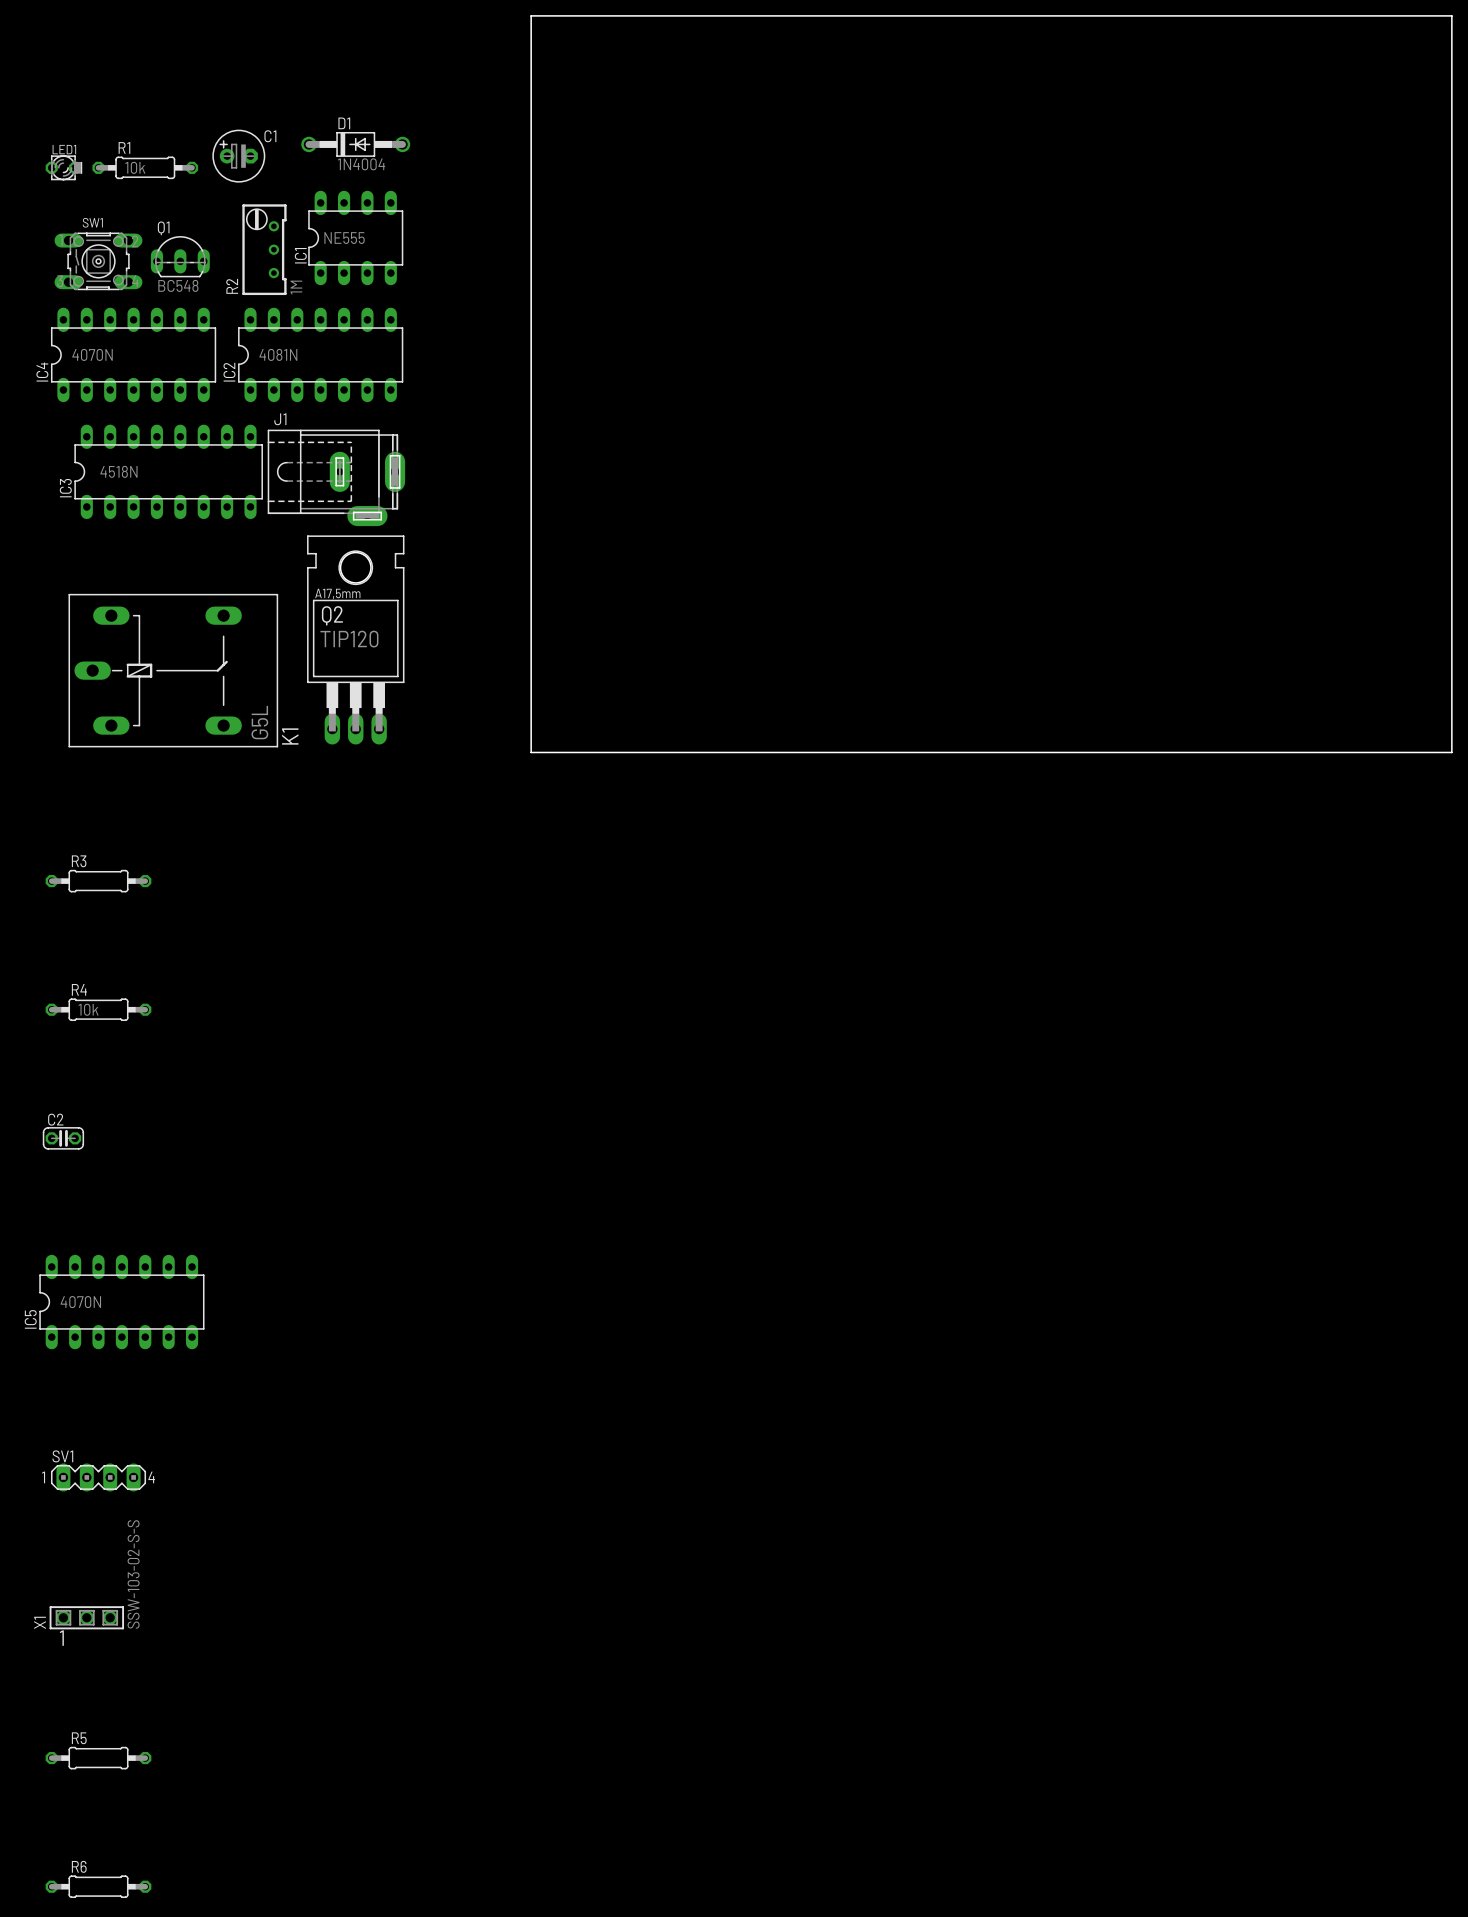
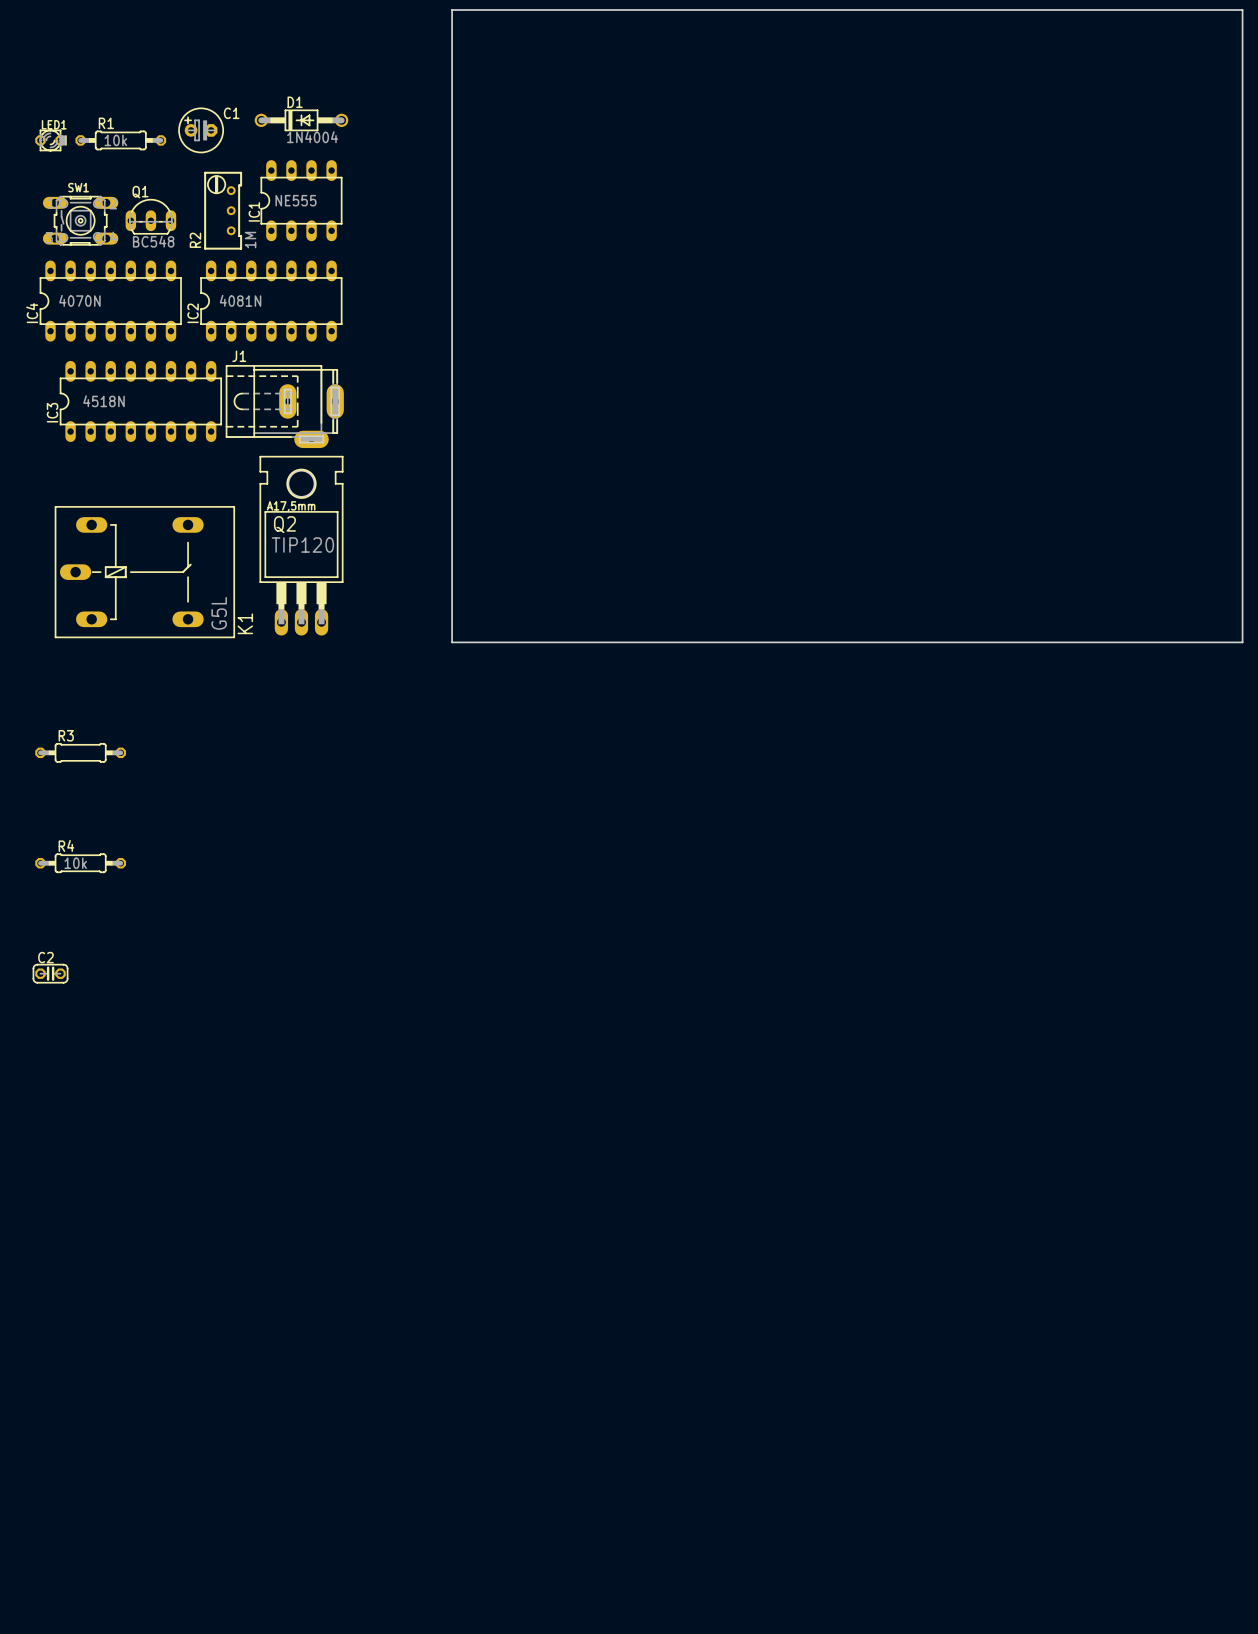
IC5: 4070N (121, 1302) -> none
SV1: (98, 1477) -> none
X1: SSW-103-02-S-S (86, 1617) -> none
R5: (98, 1758) -> none
R6: (98, 1886) -> none

